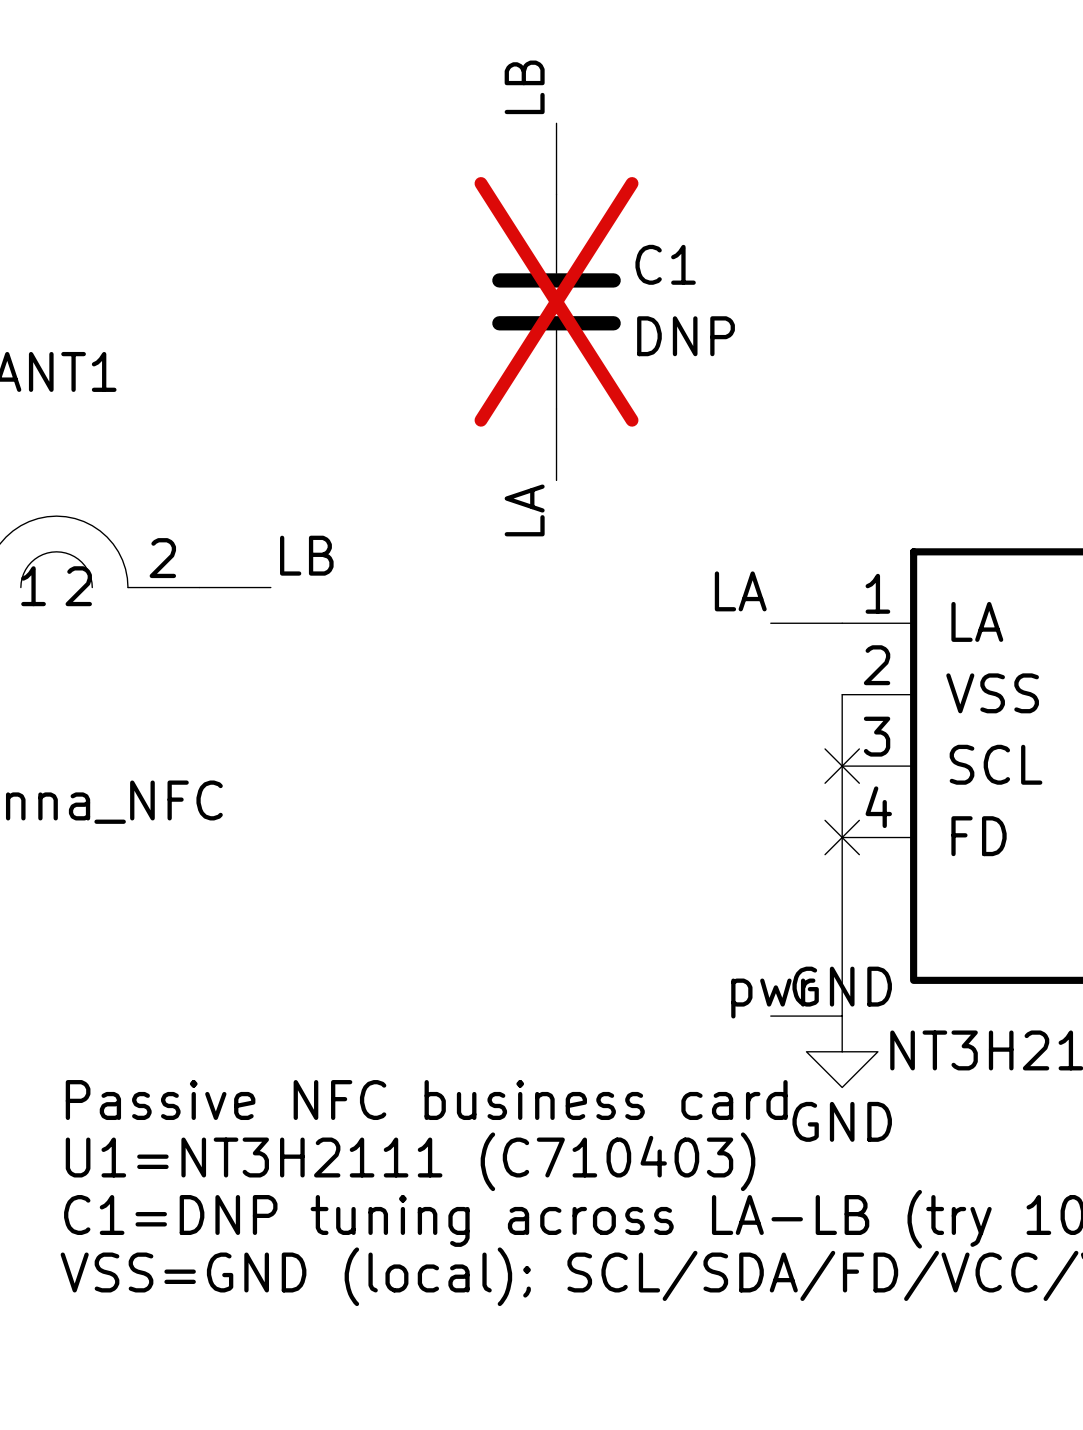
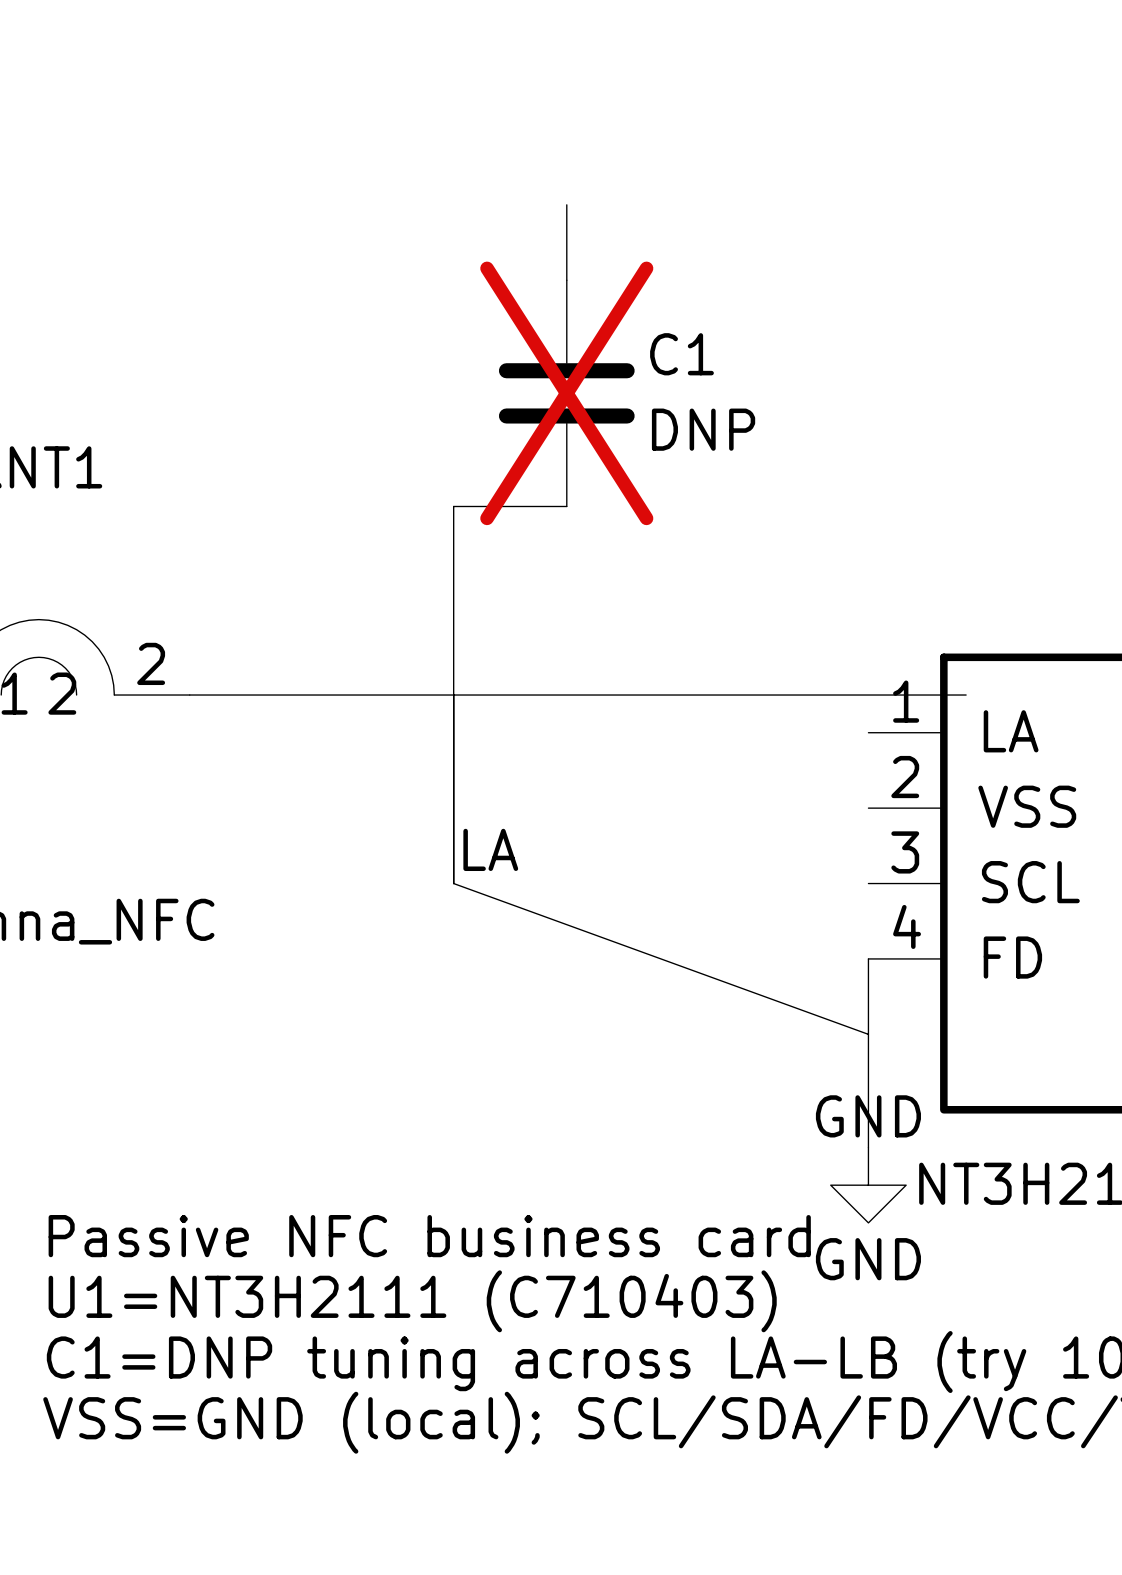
label: LB (524, 87) -> none
wire: (556, 408) (556, 480) -> (566, 506) (453, 506) (453, 883) (868, 1034)
label: LA (524, 510) -> none
label: LB (306, 555) -> none
wire: none -> (265, 695) (966, 695)
label: LA (740, 591) -> none
wire: (770, 623) (842, 623) -> none
wire: (842, 694) (842, 837) -> none
label: none -> LA (490, 849)
no-connect mark: (842, 766) -> none
no-connect mark: (842, 837) -> none
power symbol: (773, 998) -> none
wire: (770, 1016) (842, 1016) -> none

